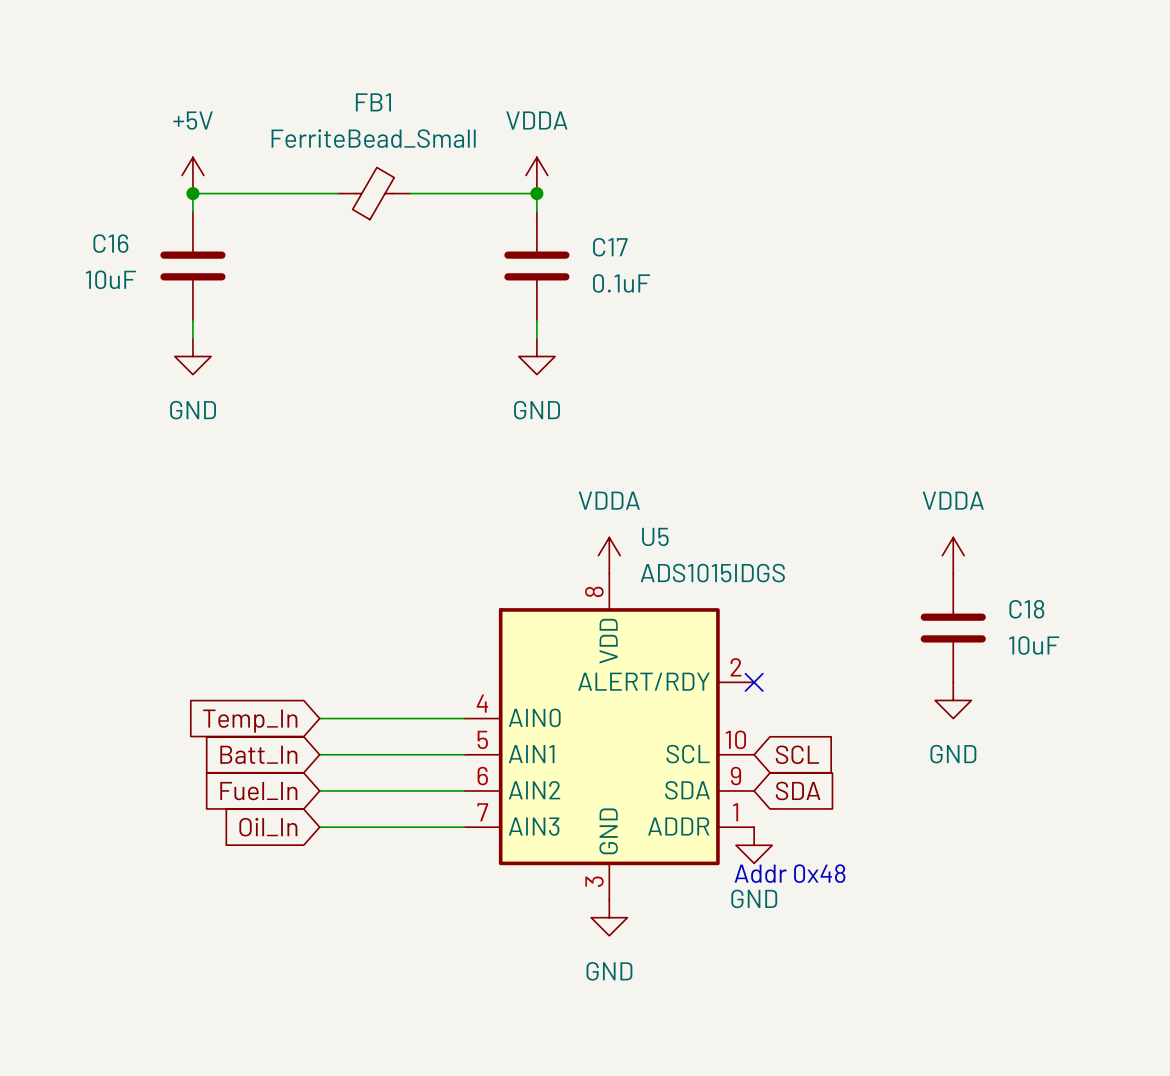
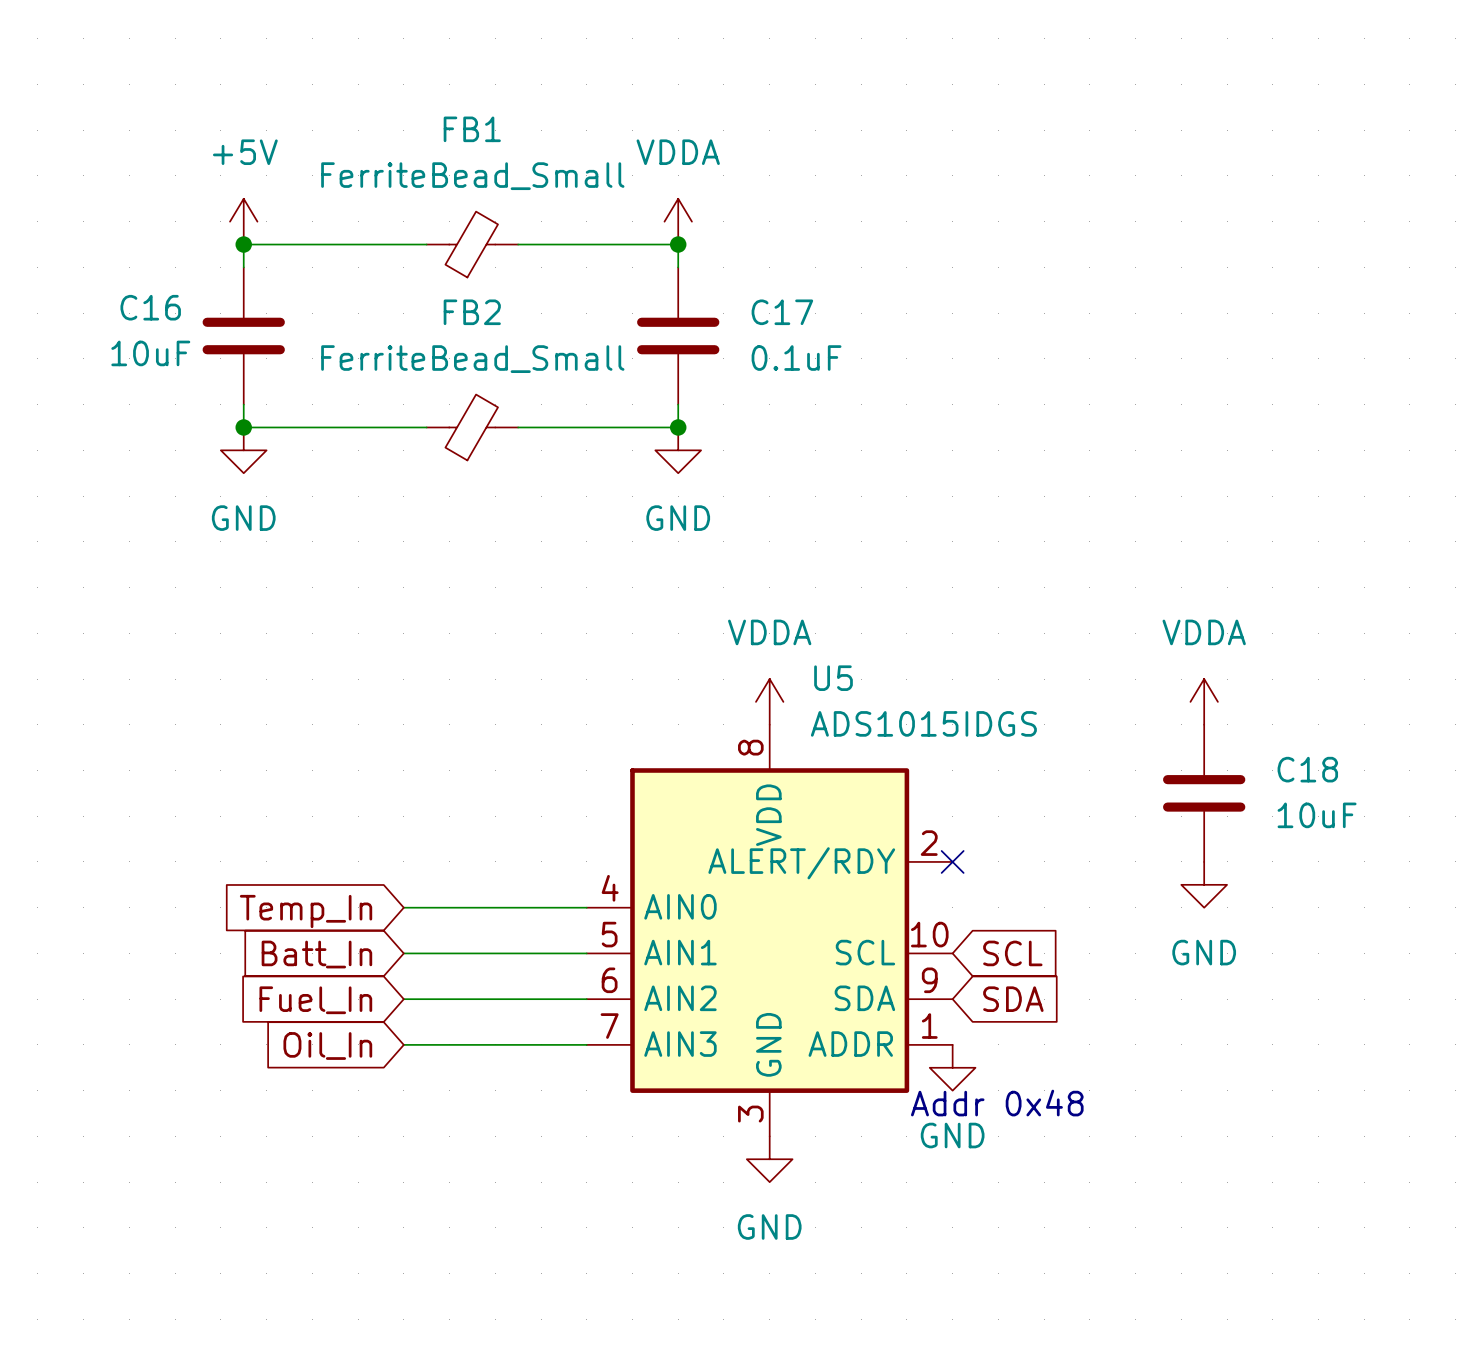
wire: none -> (243, 427) (426, 427)
junction: none -> (243, 427)
FB2: none -> FerriteBead_Small (472, 427)
wire: none -> (518, 427) (678, 427)
junction: none -> (678, 427)

